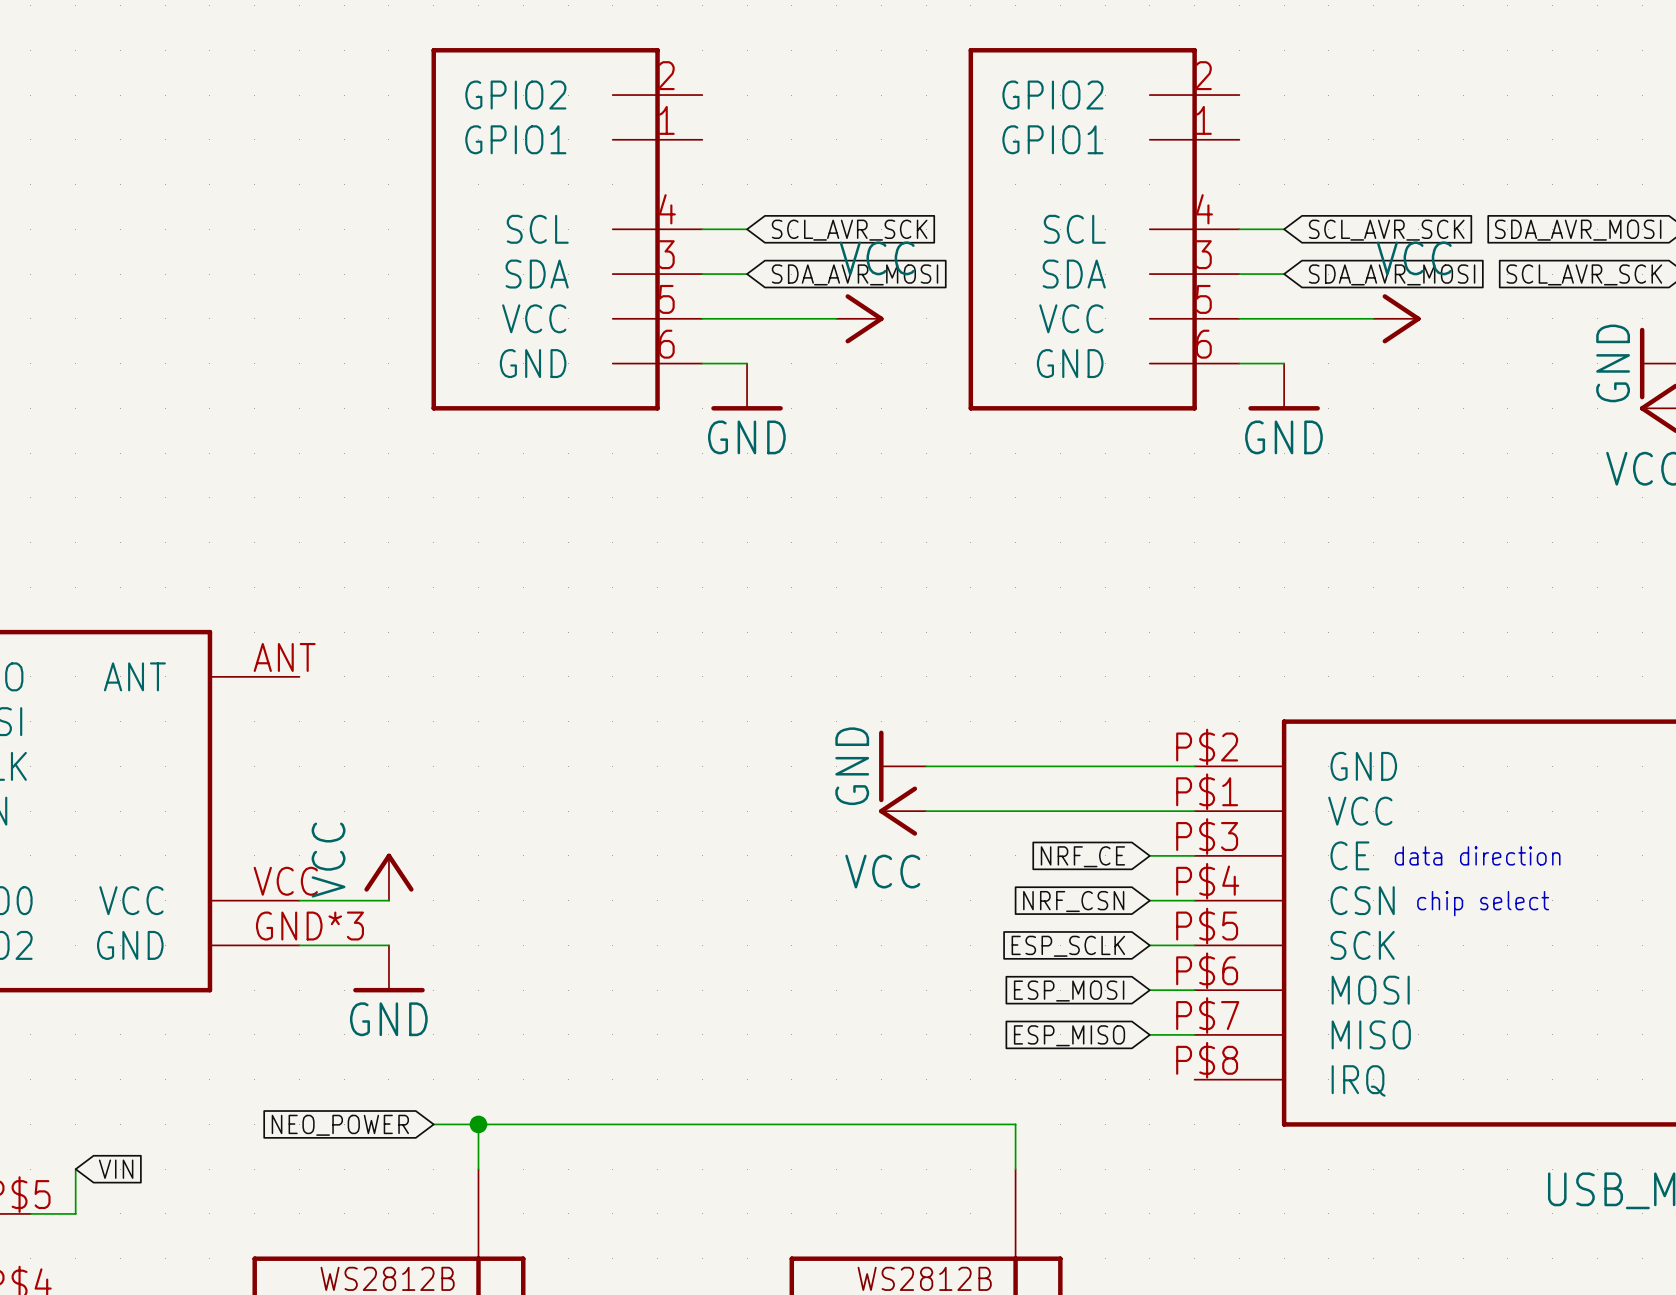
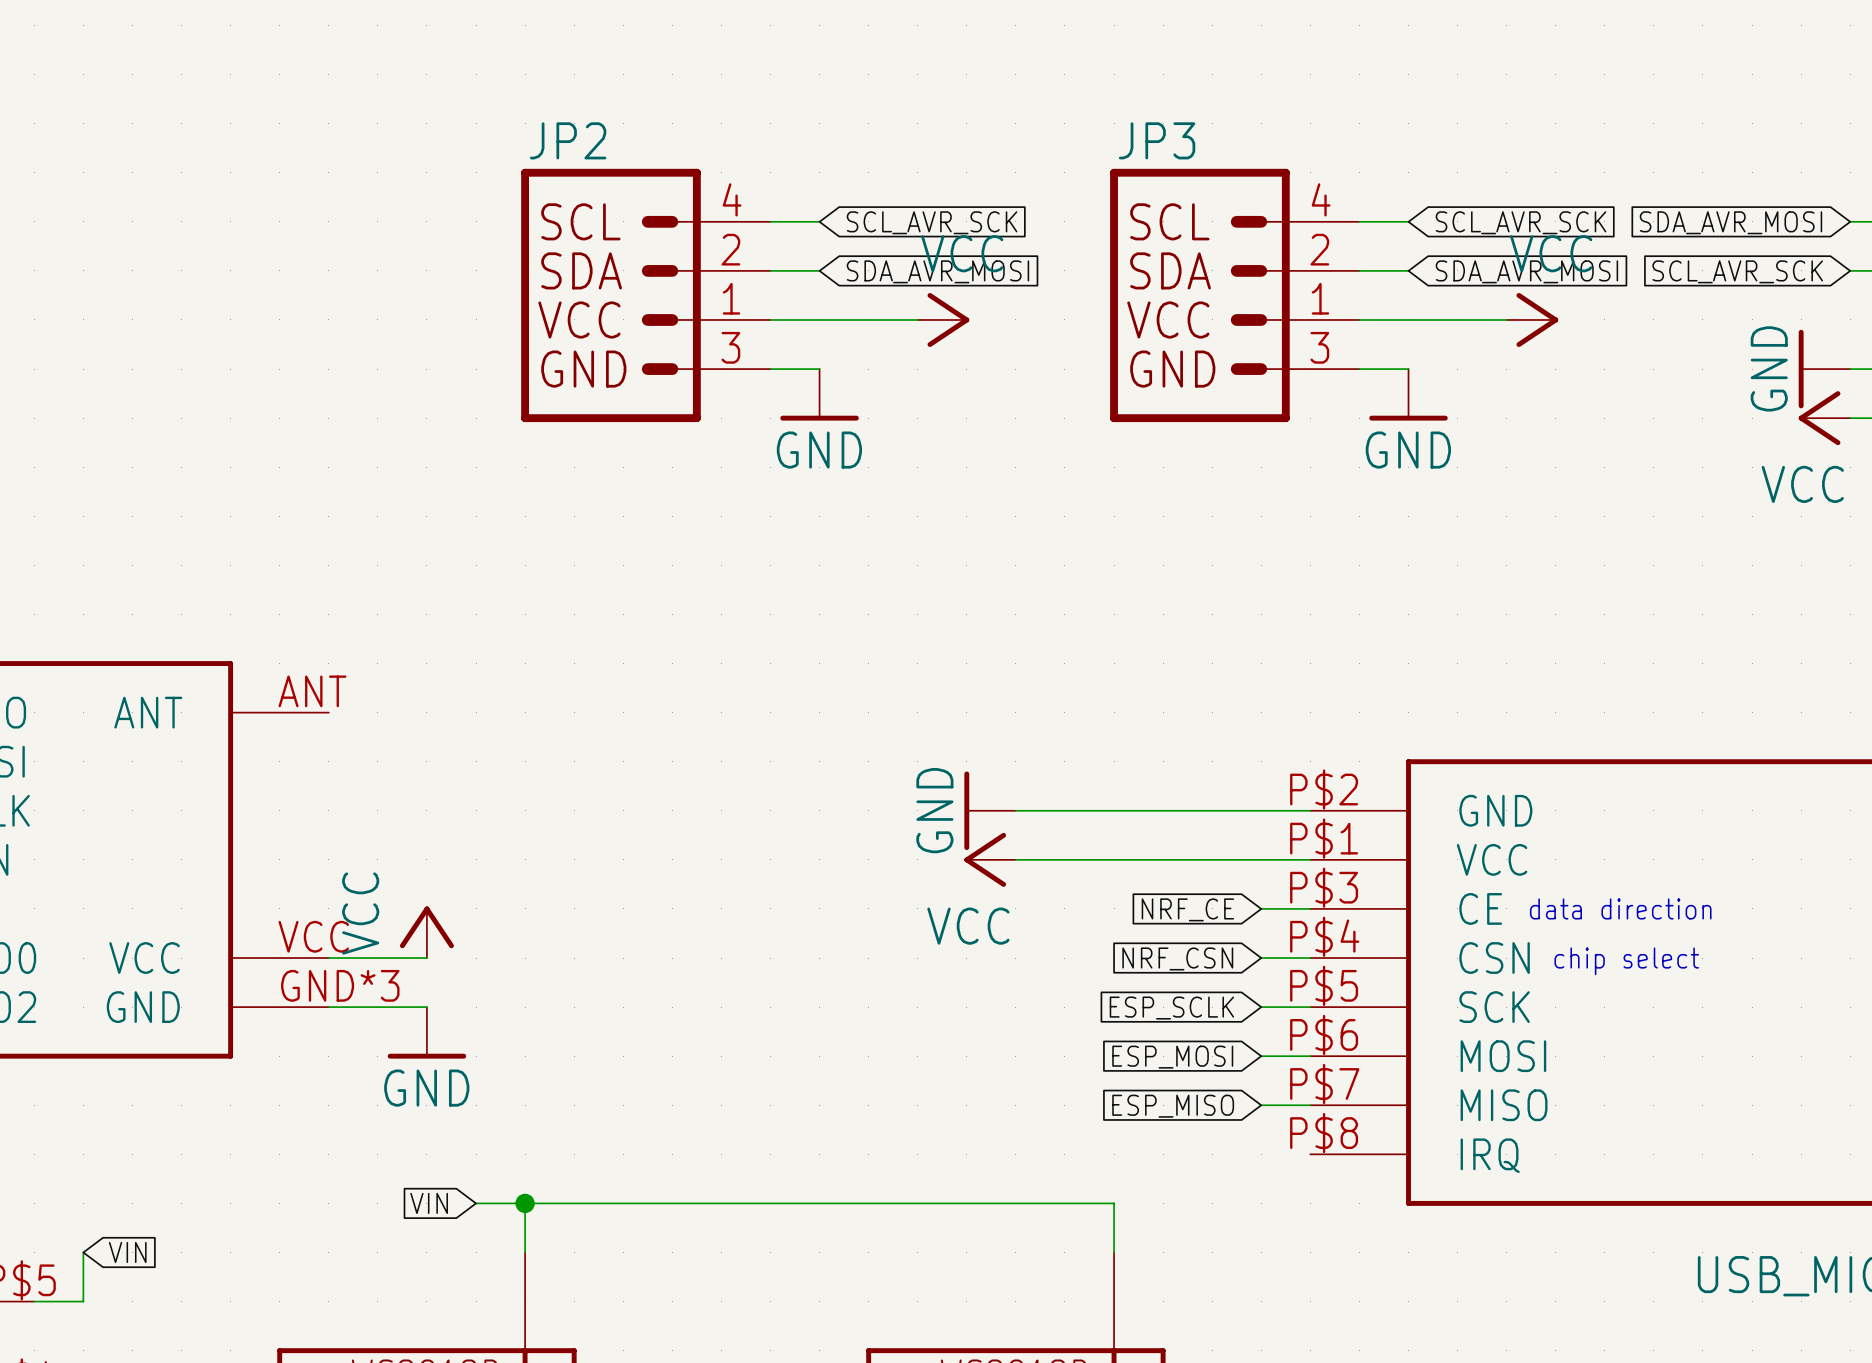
part: (566, 229) -> none
part: (1103, 229) -> none
JP2: none -> (645, 295)
JP3: none -> (1234, 295)
global label: NEO_POWER (340, 1125) -> VIN (429, 1203)

